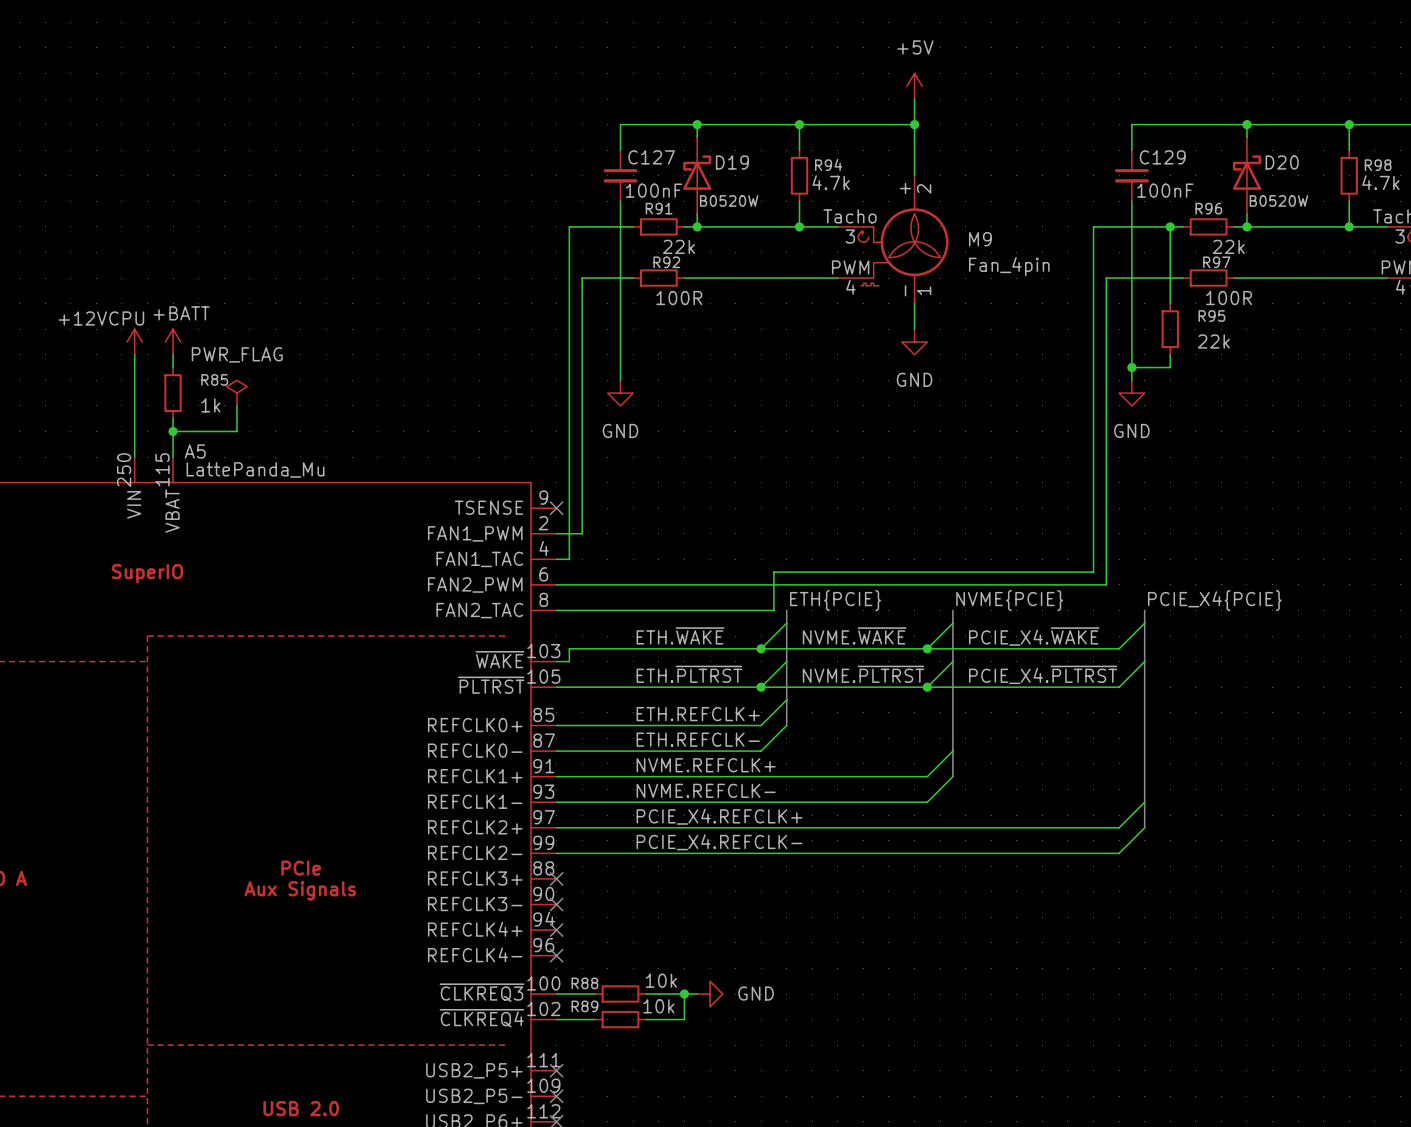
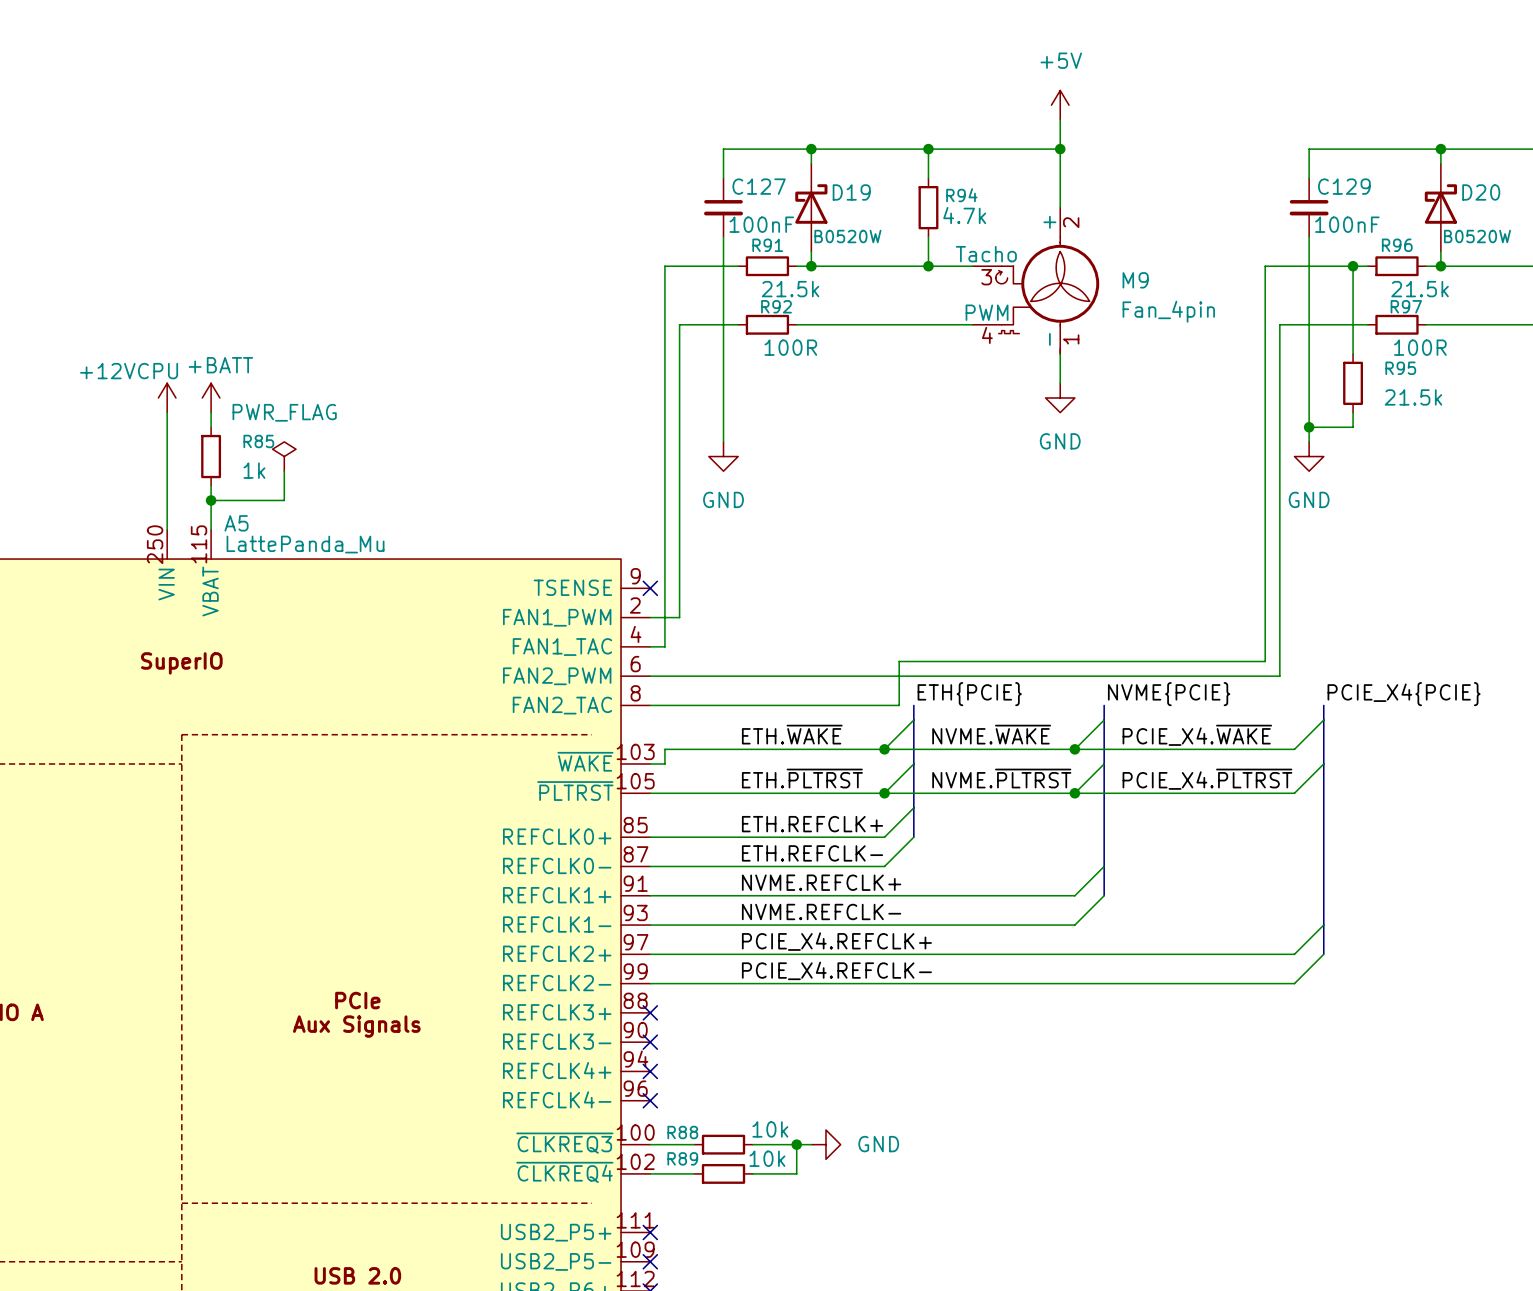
R91 value: 22k (679, 246) -> 21.5k (790, 289)
R96 value: 22k (1228, 246) -> 21.5k (1420, 289)
R95 value: 22k (1213, 341) -> 21.5k (1413, 397)

